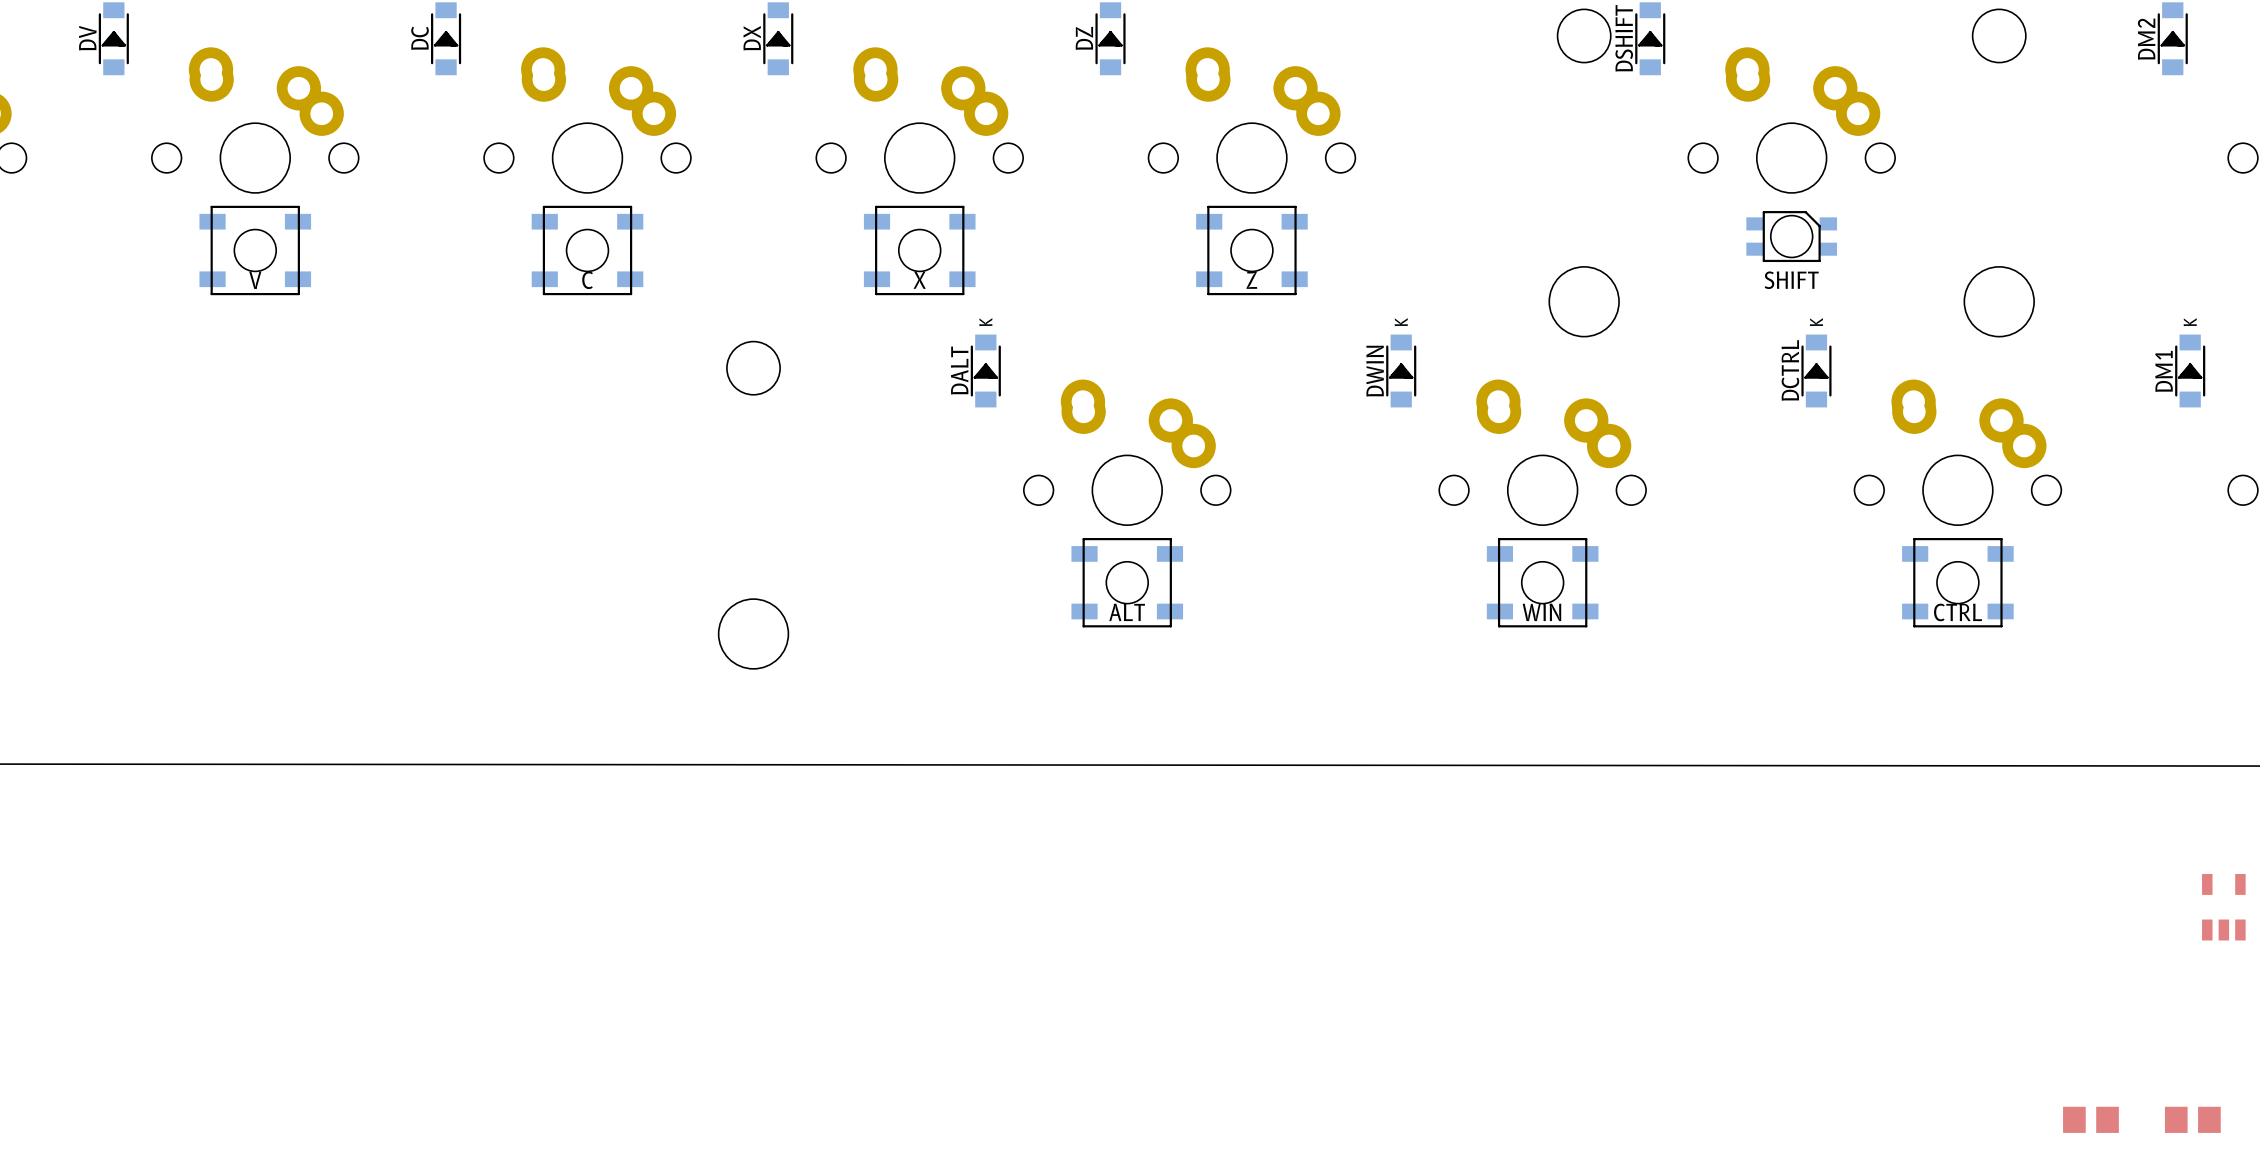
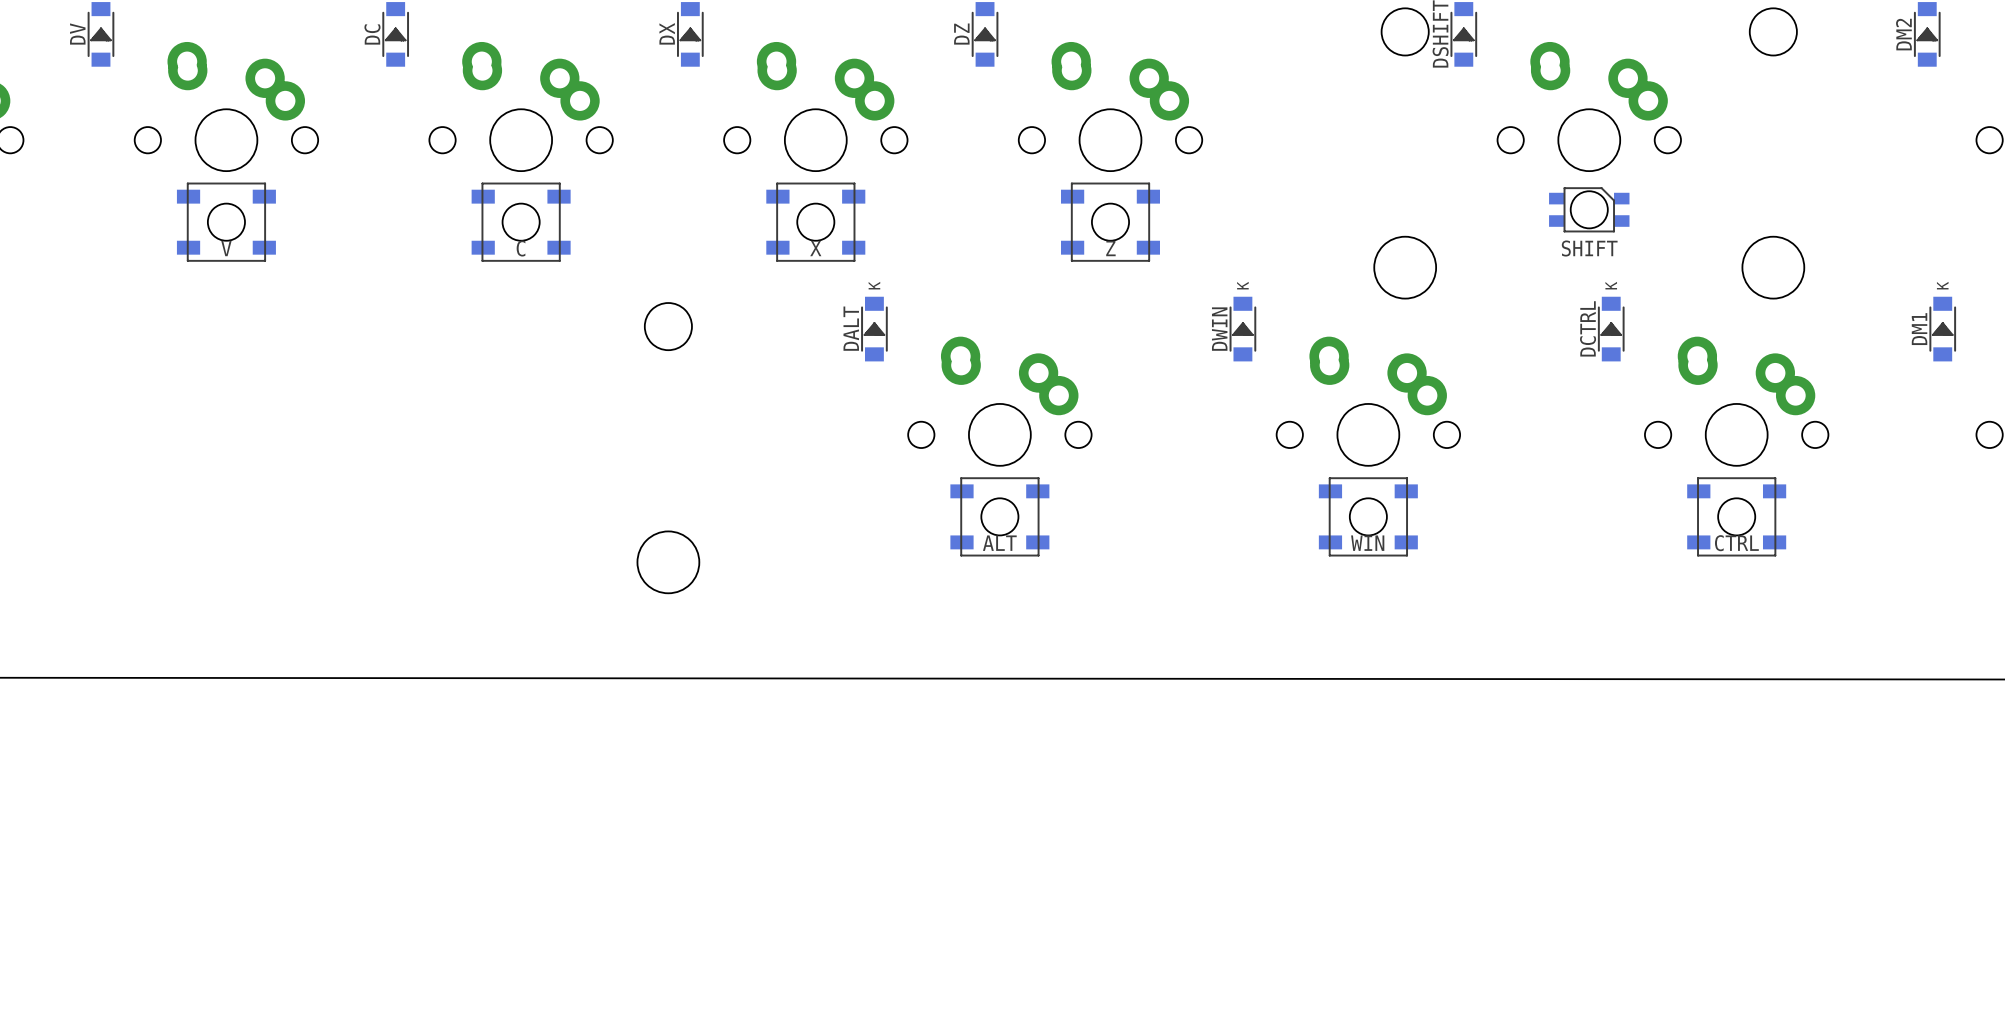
part: (2223, 907) -> none
part: (2090, 1119) -> none
part: (2192, 1119) -> none

